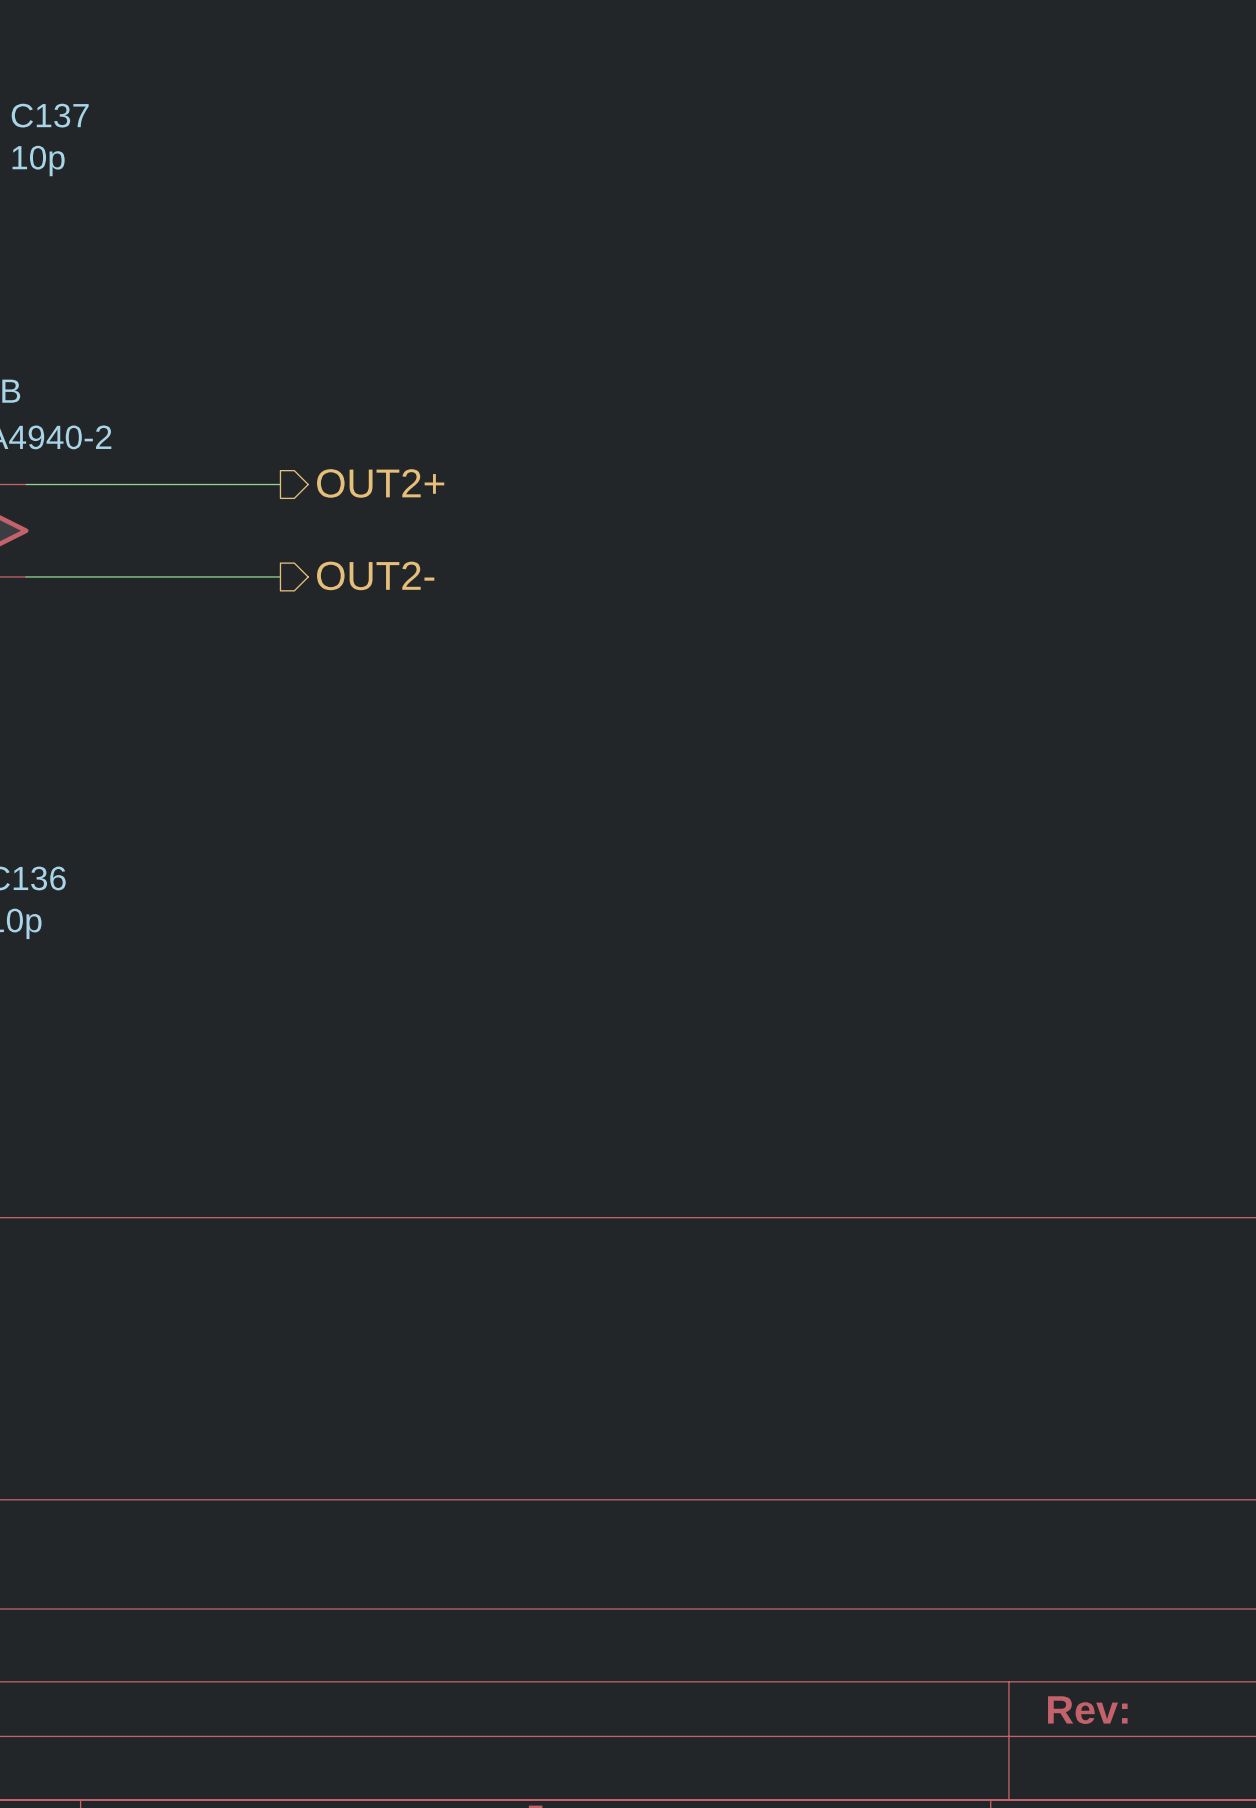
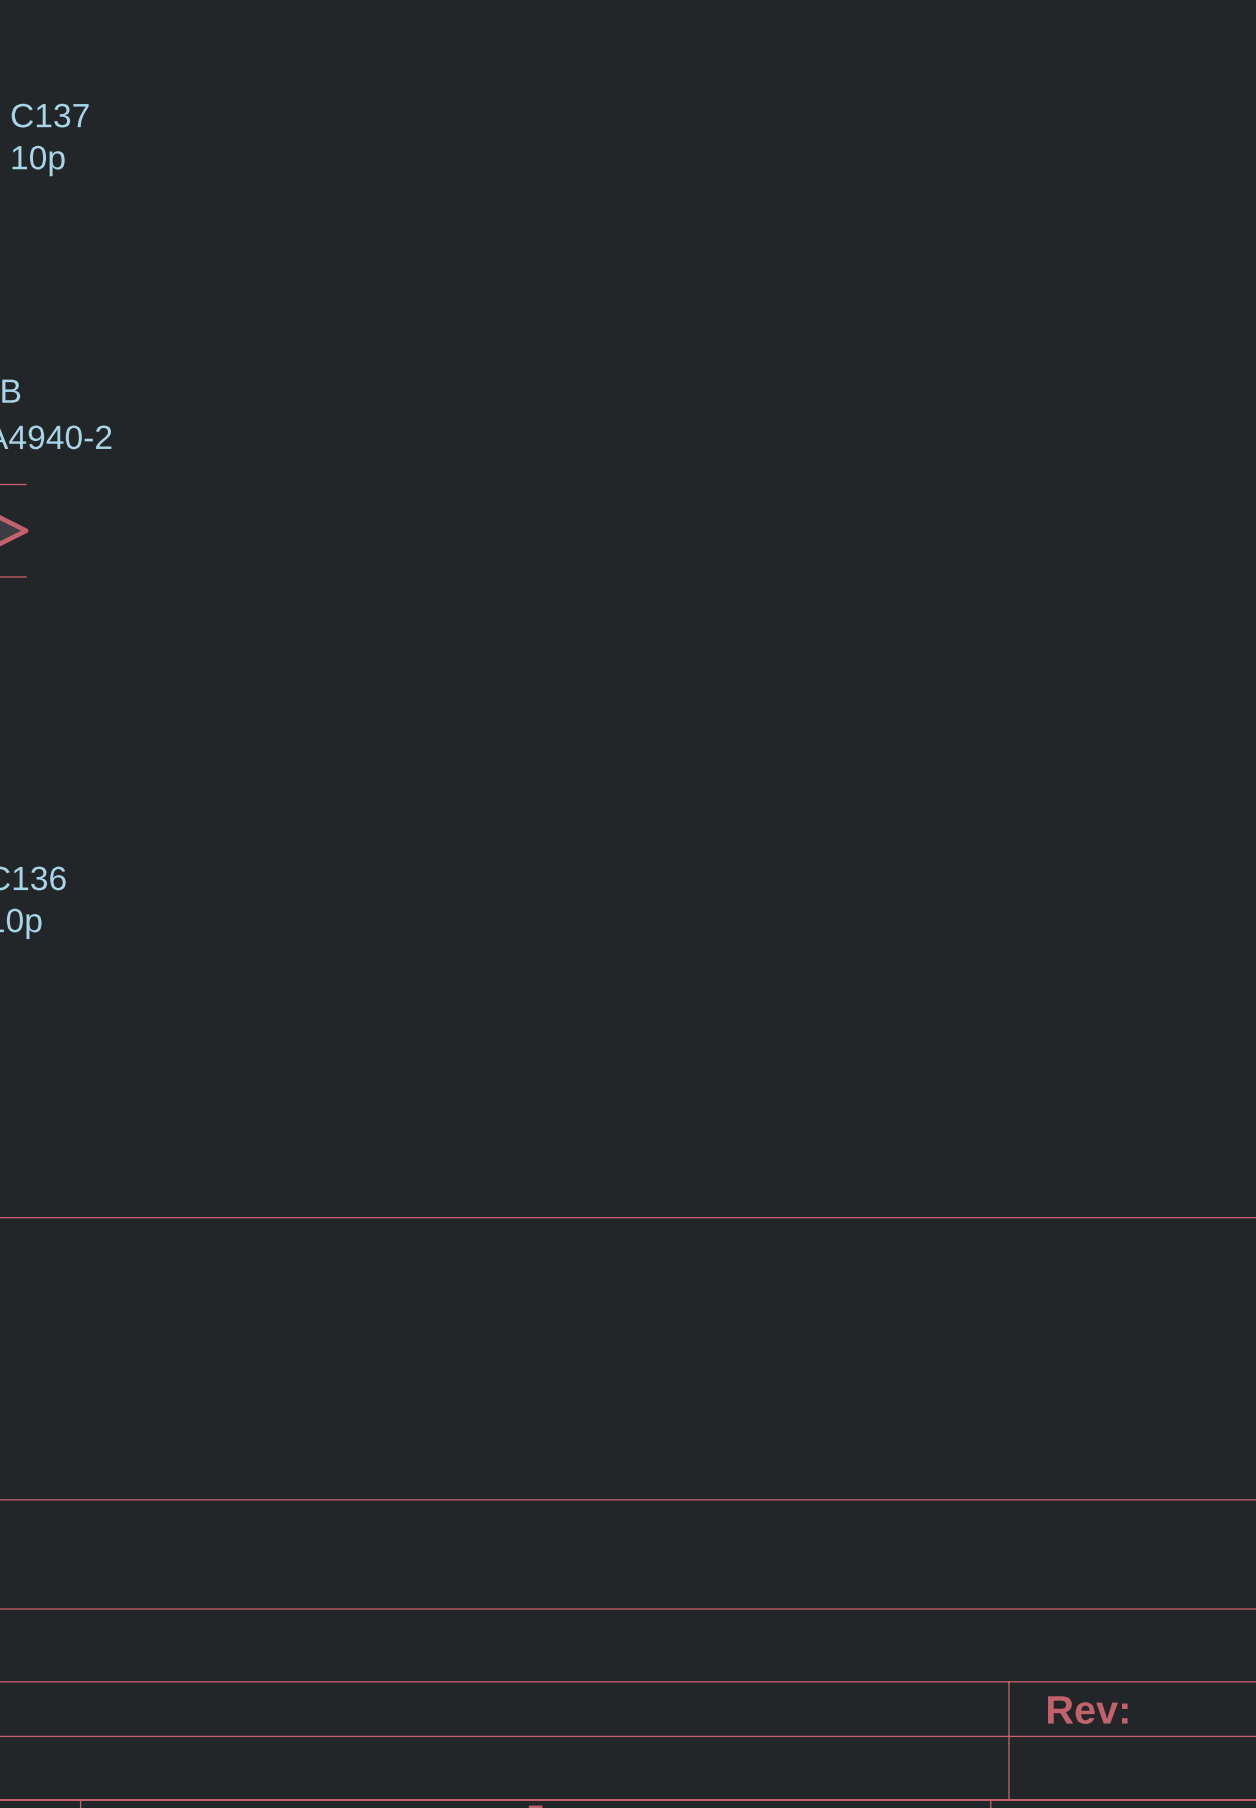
hierarchical label: OUT2+ (380, 483) -> none
wire: (26, 484) (280, 484) -> none
hierarchical label: OUT2- (375, 575) -> none
wire: (26, 576) (280, 576) -> none

